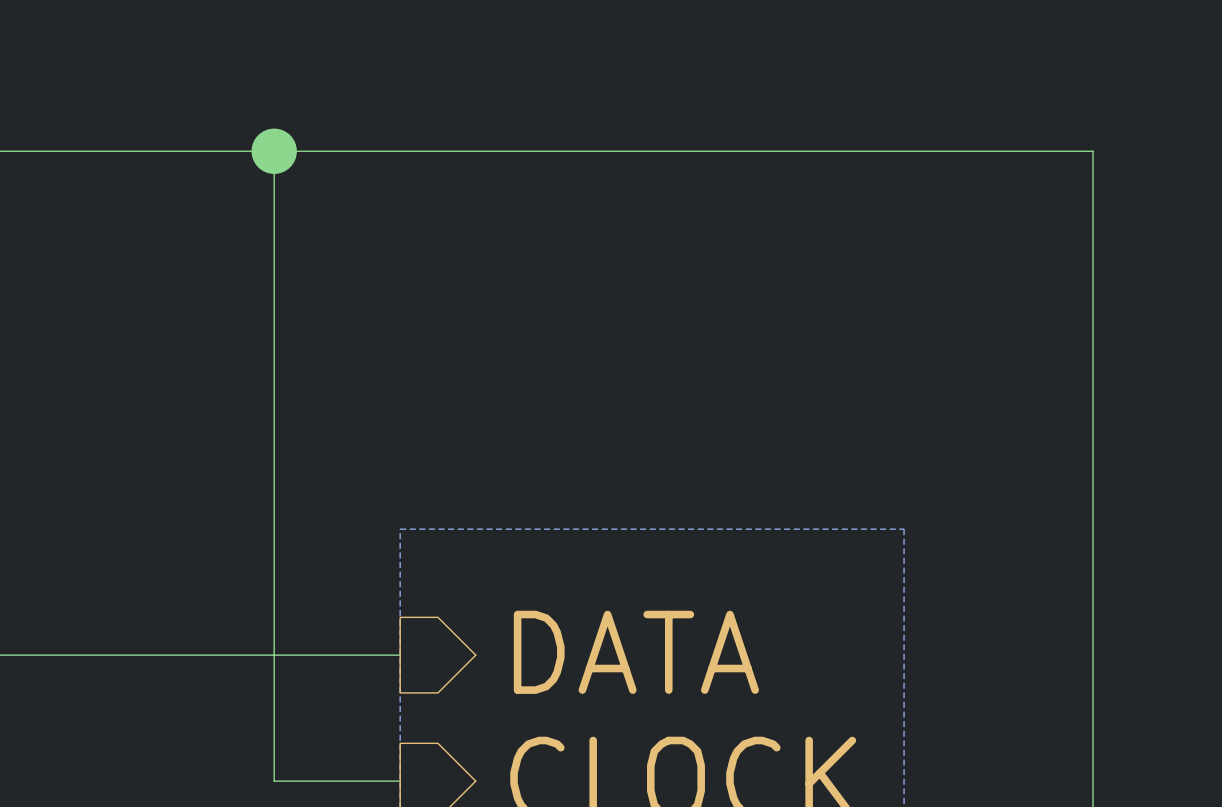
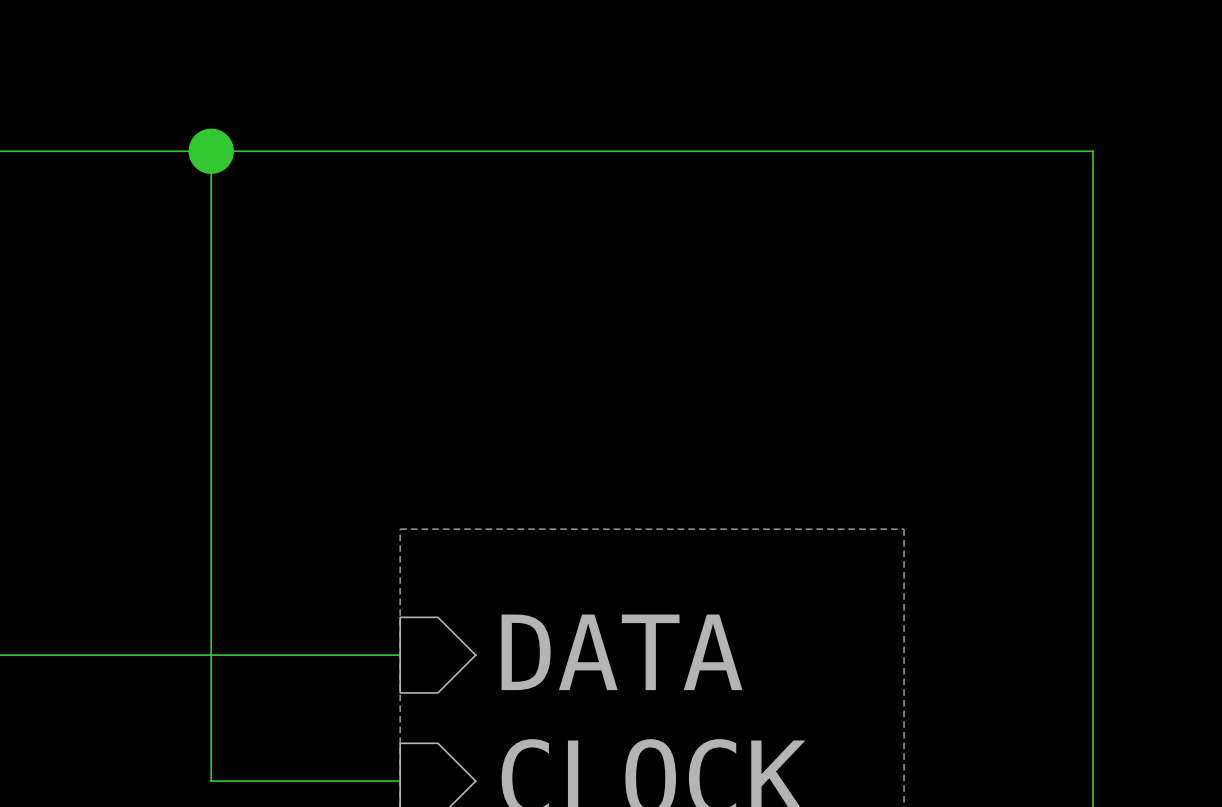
wire: (274, 151) (274, 781) -> (211, 151) (211, 781) (274, 781)
junction position: (274, 151) -> (211, 151)

